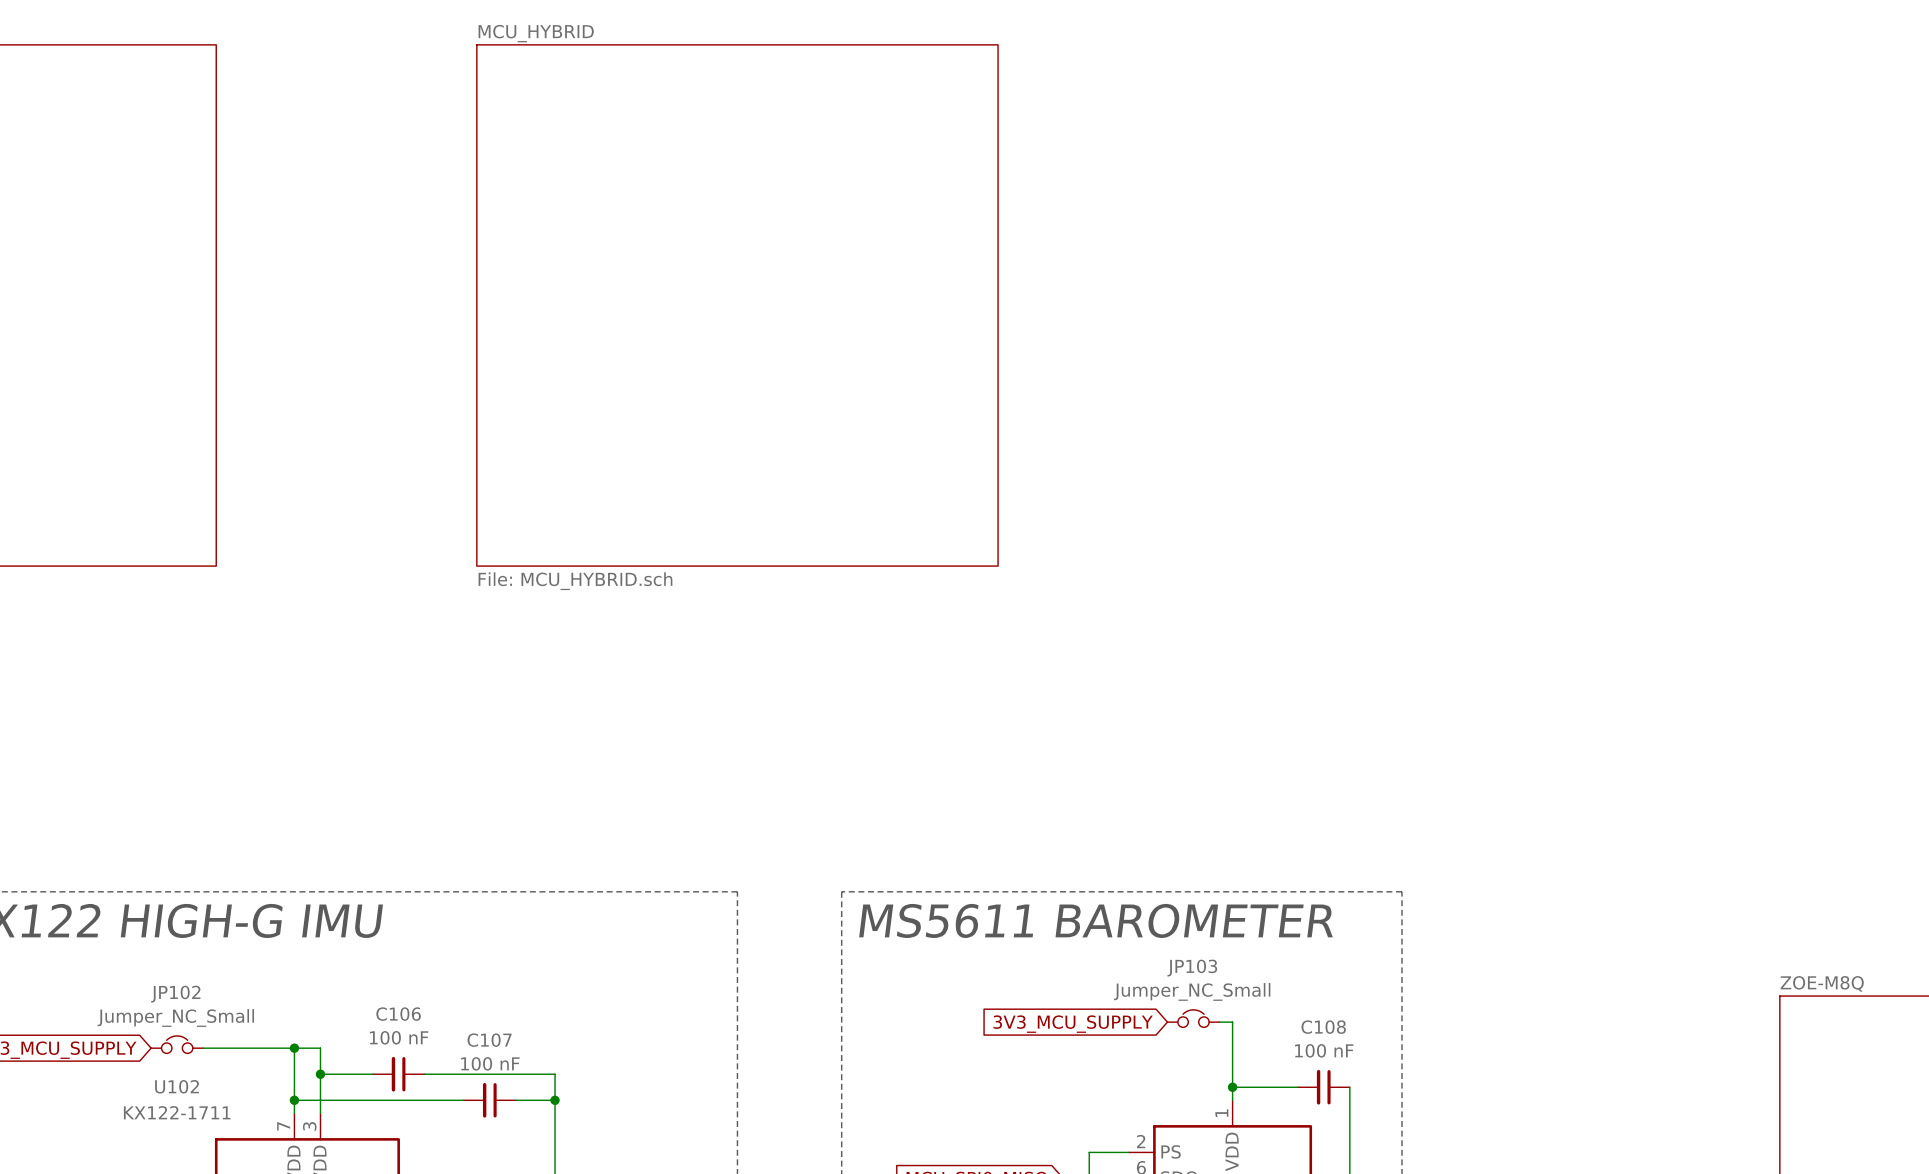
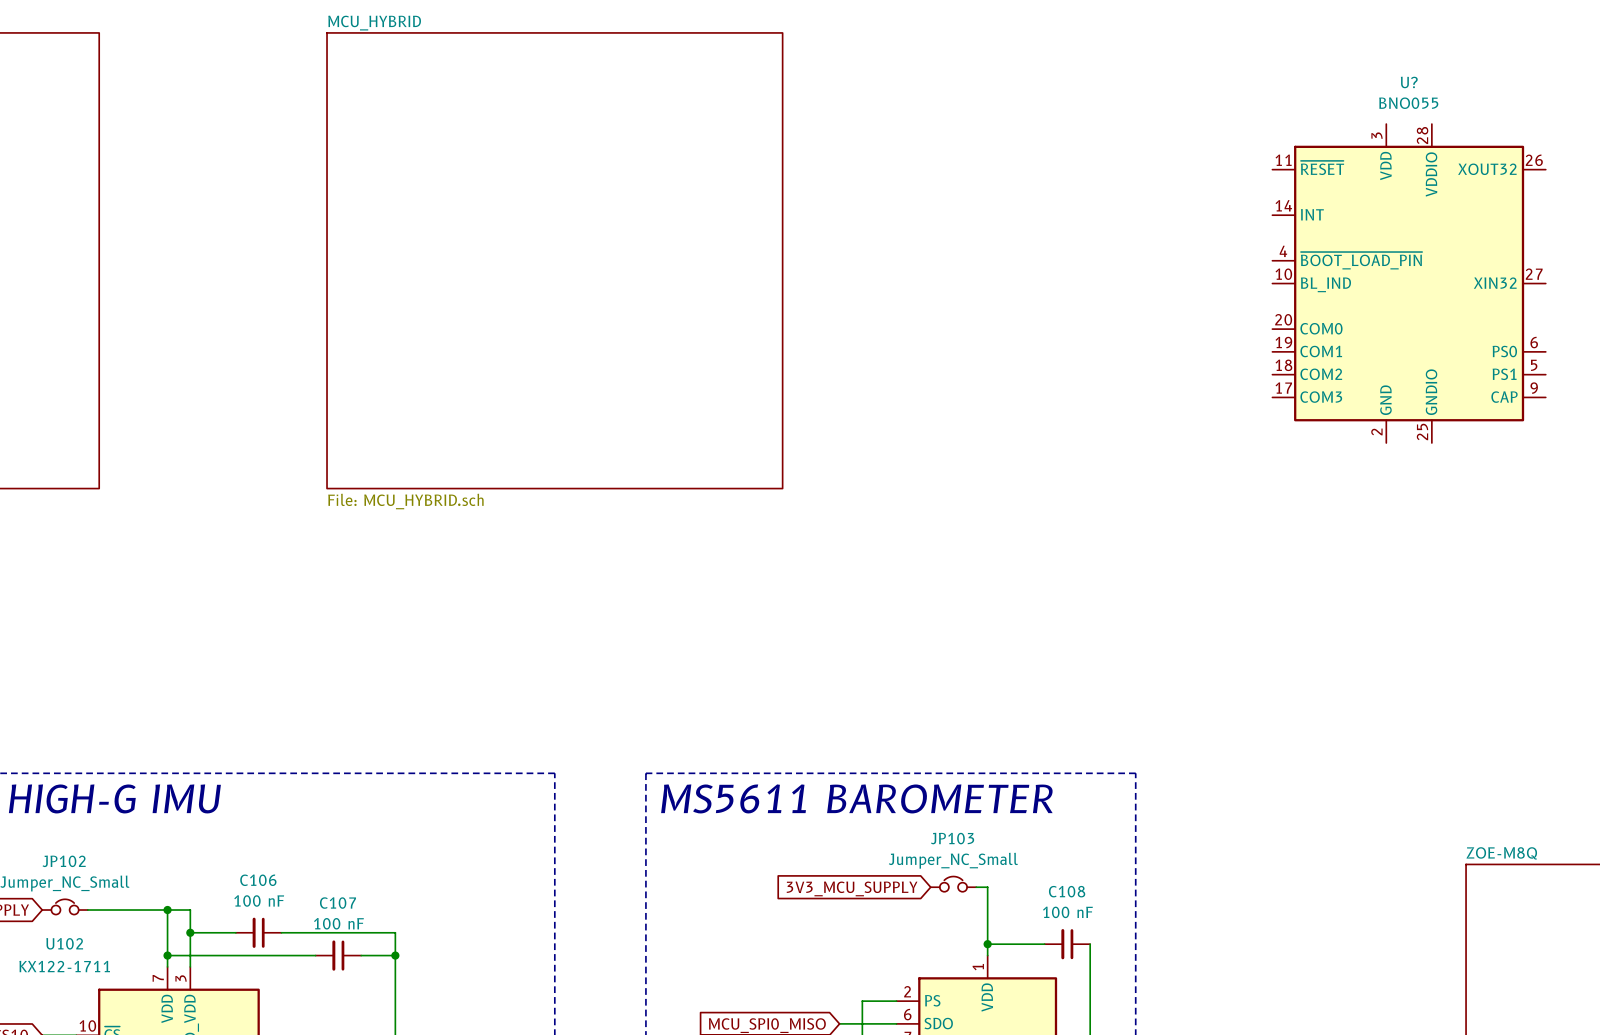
U?: none -> BNO055 (1409, 283)

